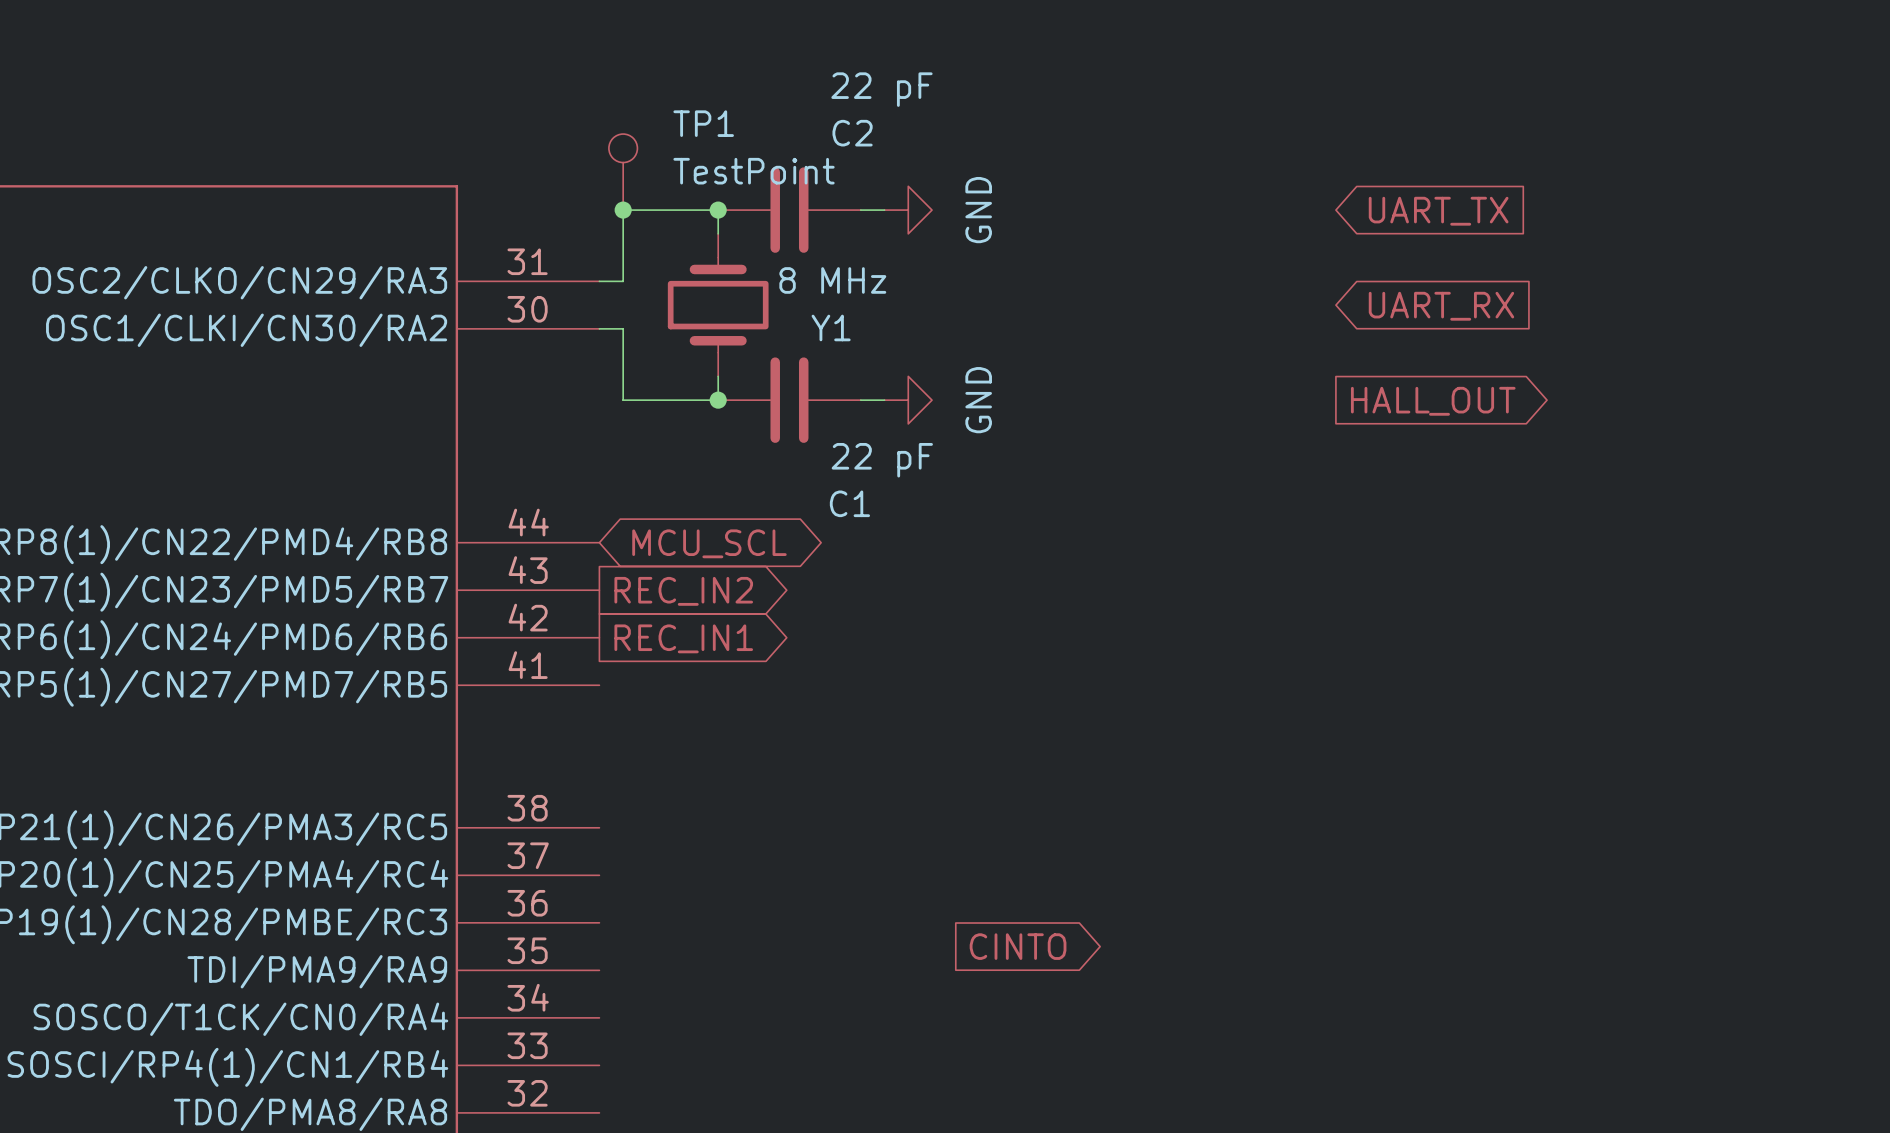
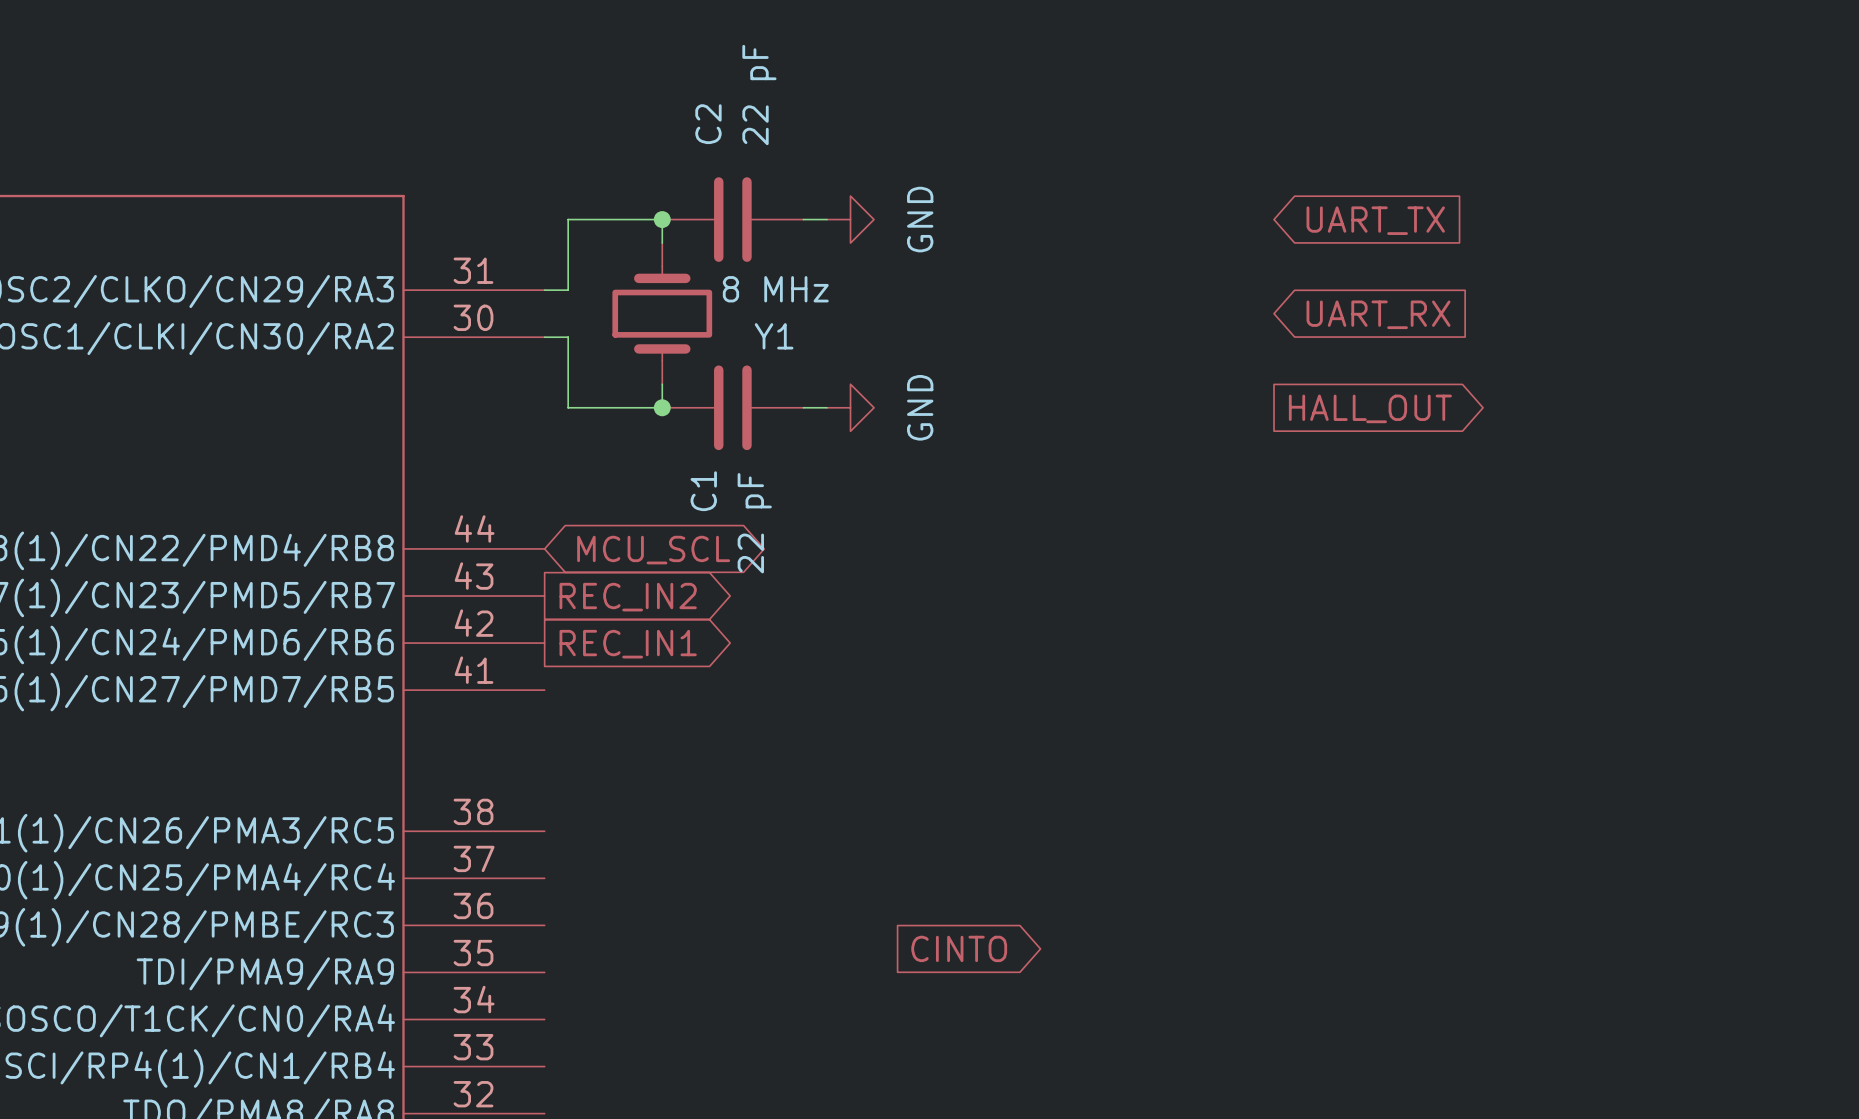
C2 value rotation: 0° (881, 89) -> 90° counterclockwise (759, 95)
C2 name rotation: 0° (852, 133) -> 90° counterclockwise (708, 124)
C2 name position: C2 (852, 133) -> C2 (708, 124)
TP1: TestPoint (623, 172) -> none
junction: (623, 210) -> none
C1 value rotation: 0° (882, 460) -> 90° counterclockwise (754, 523)
C1 name rotation: 0° (849, 503) -> 90° counterclockwise (703, 491)
C1 name position: C1 (849, 503) -> C1 (703, 491)

